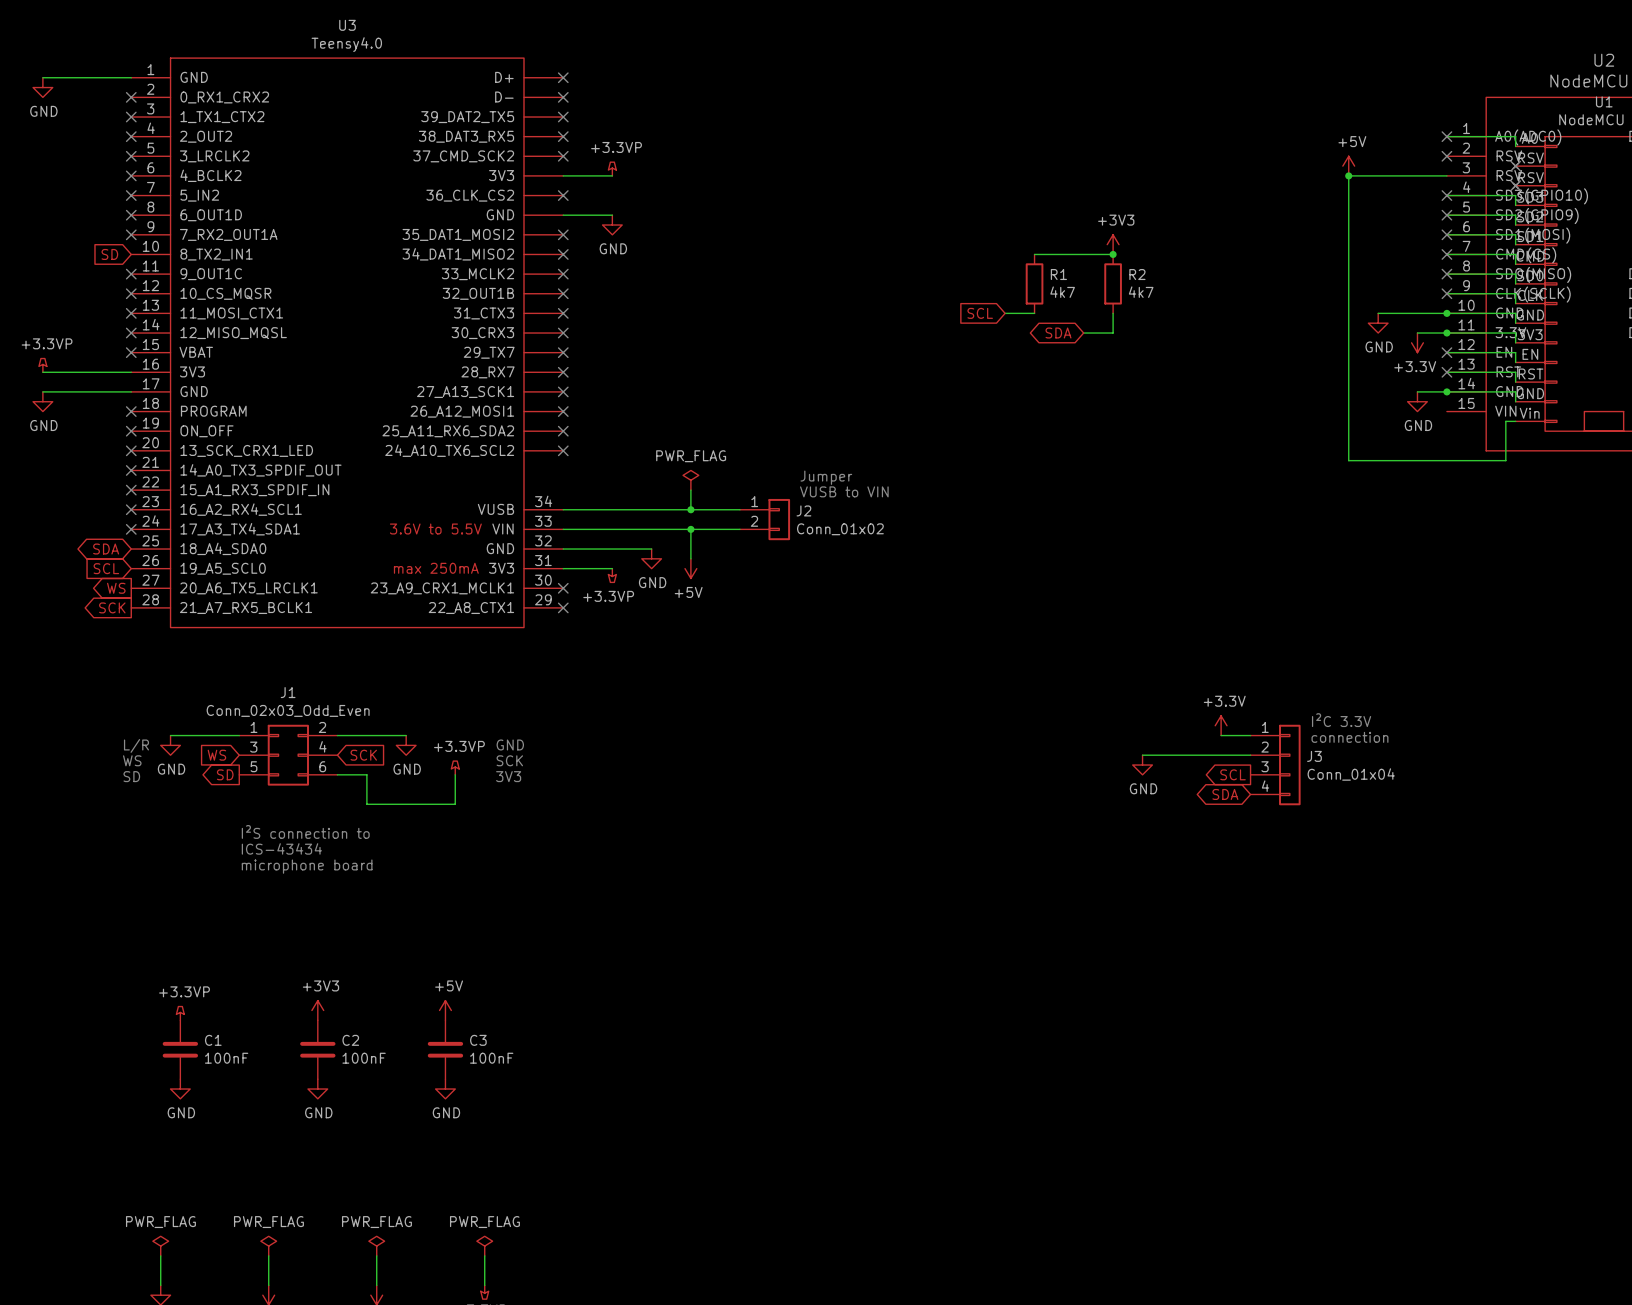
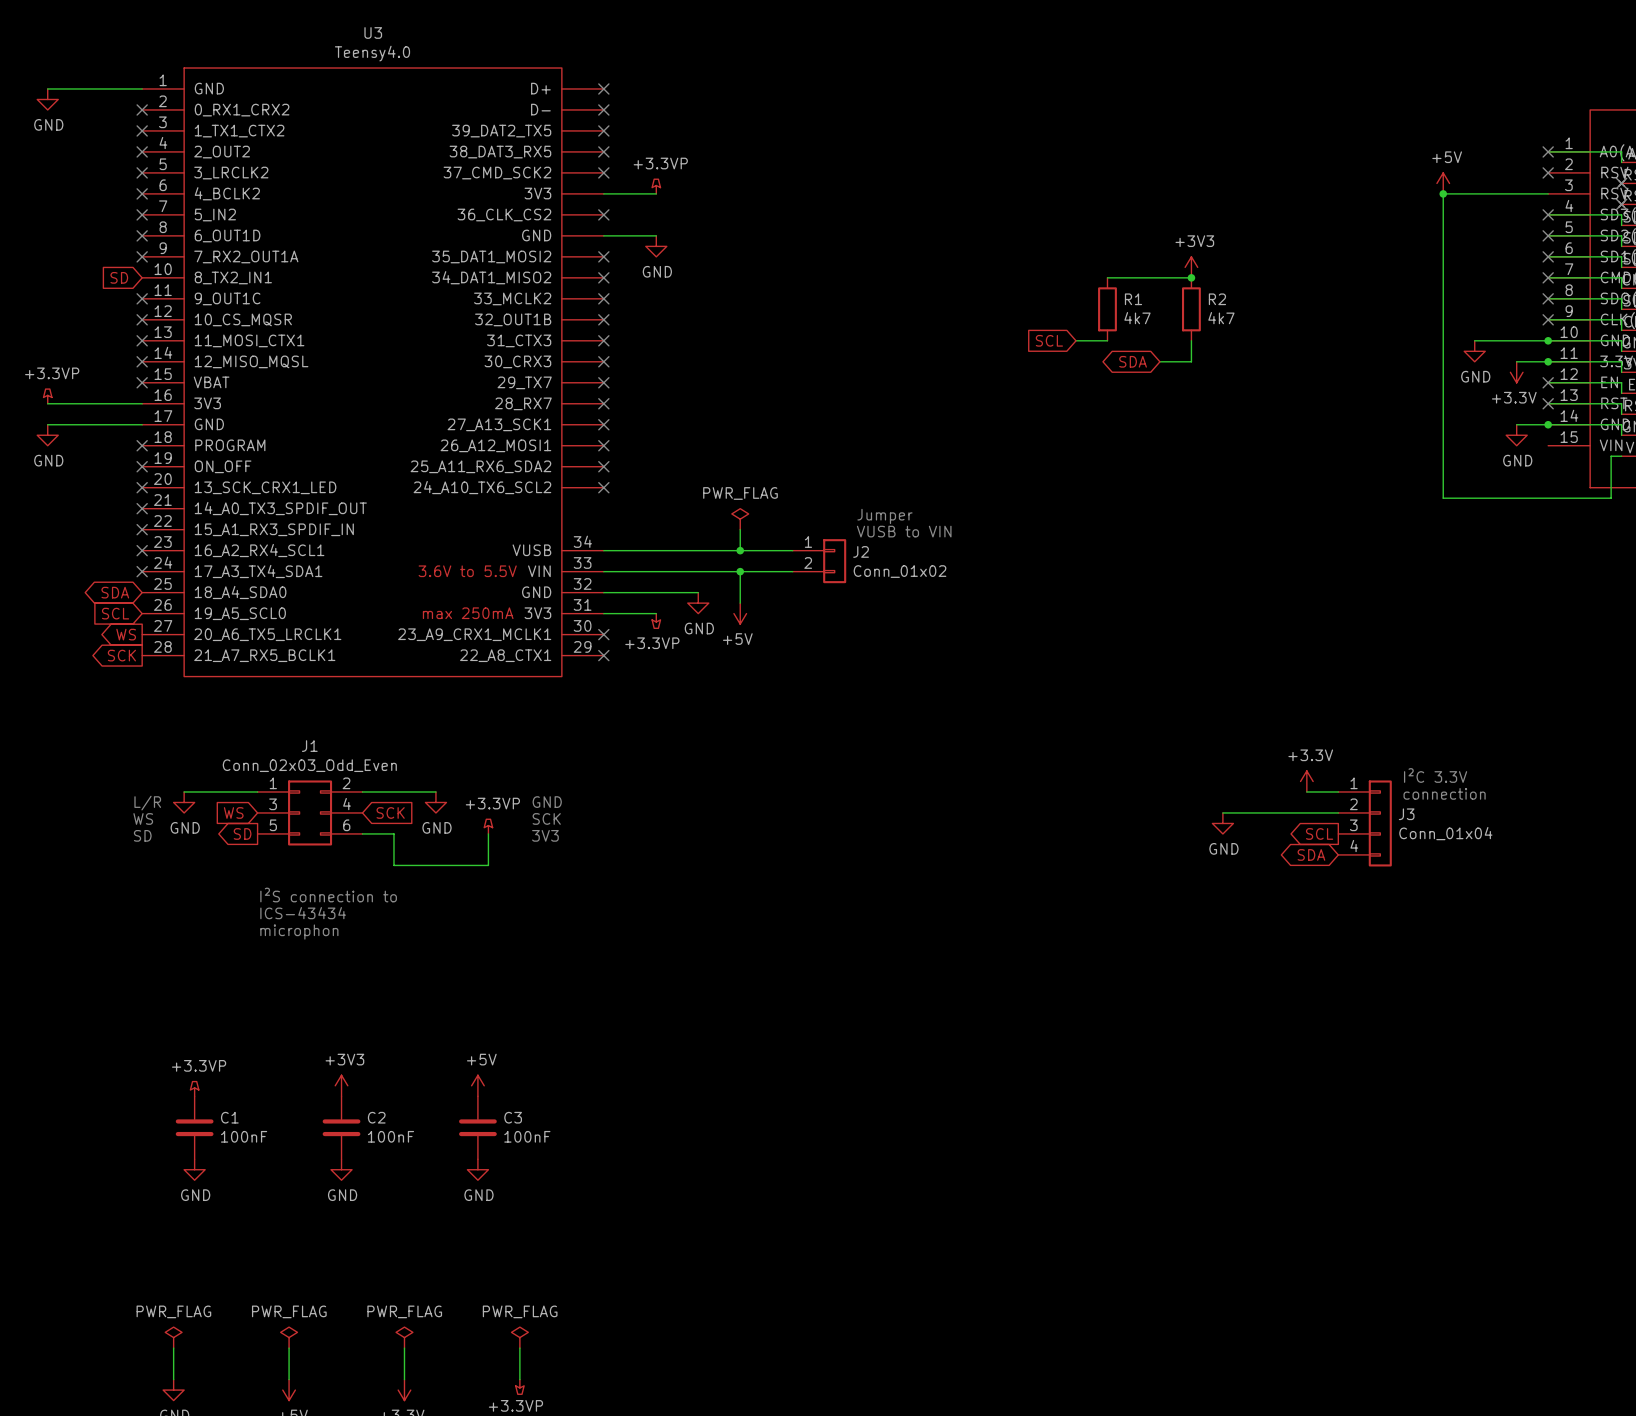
text: microphone board (307, 866) -> microphon (299, 932)

